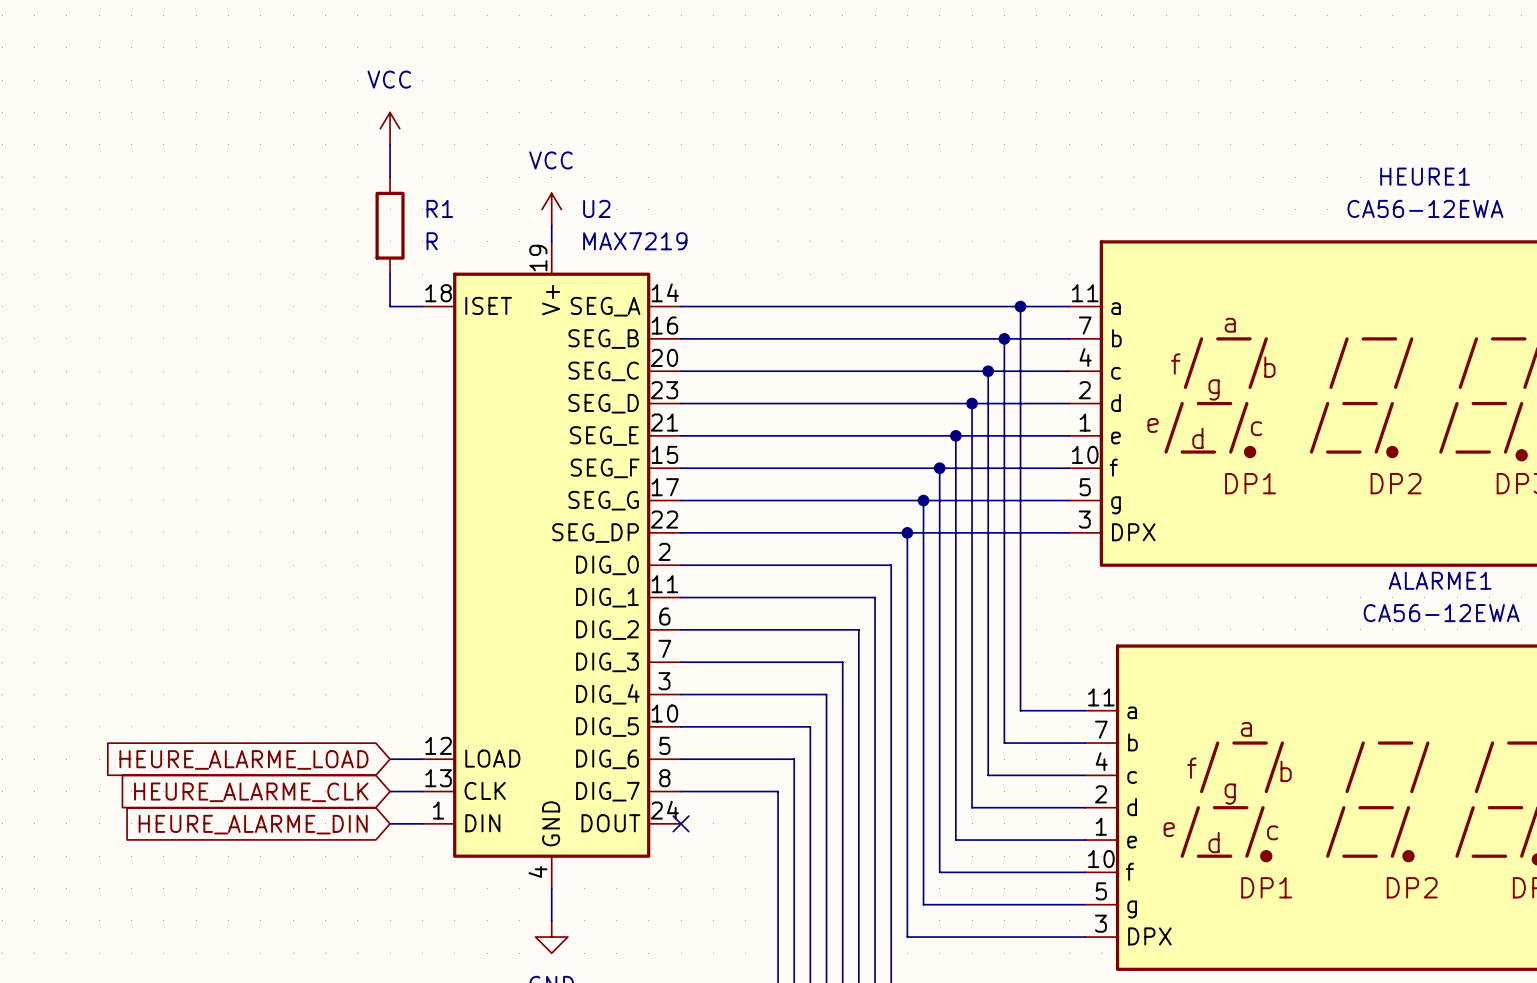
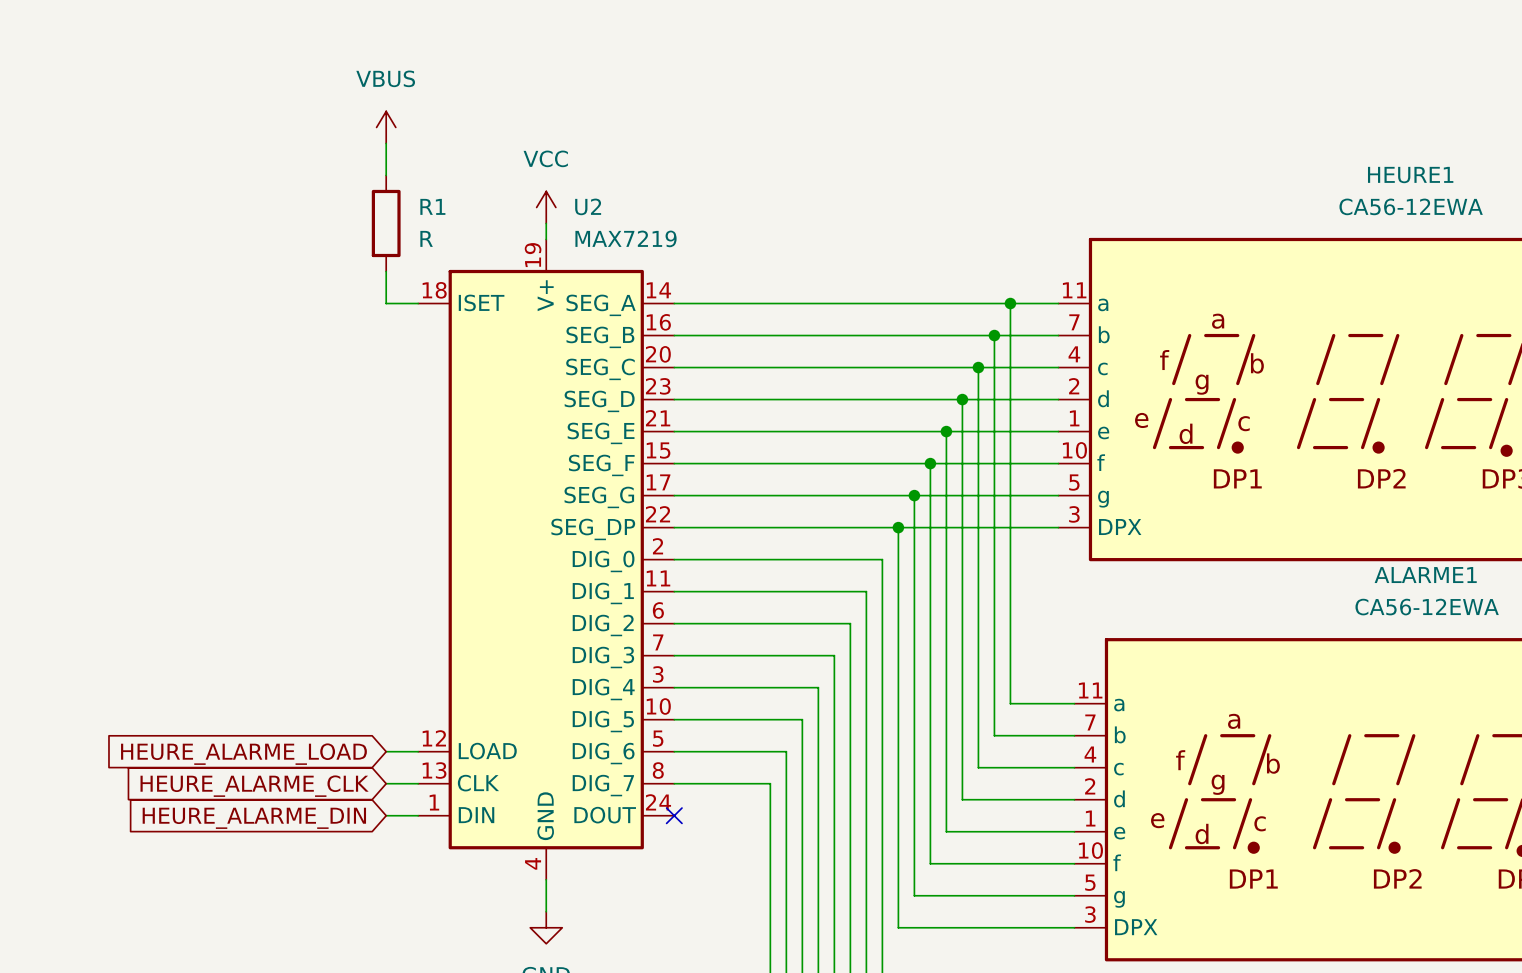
power symbol: VCC (390, 128) -> VBUS (386, 127)

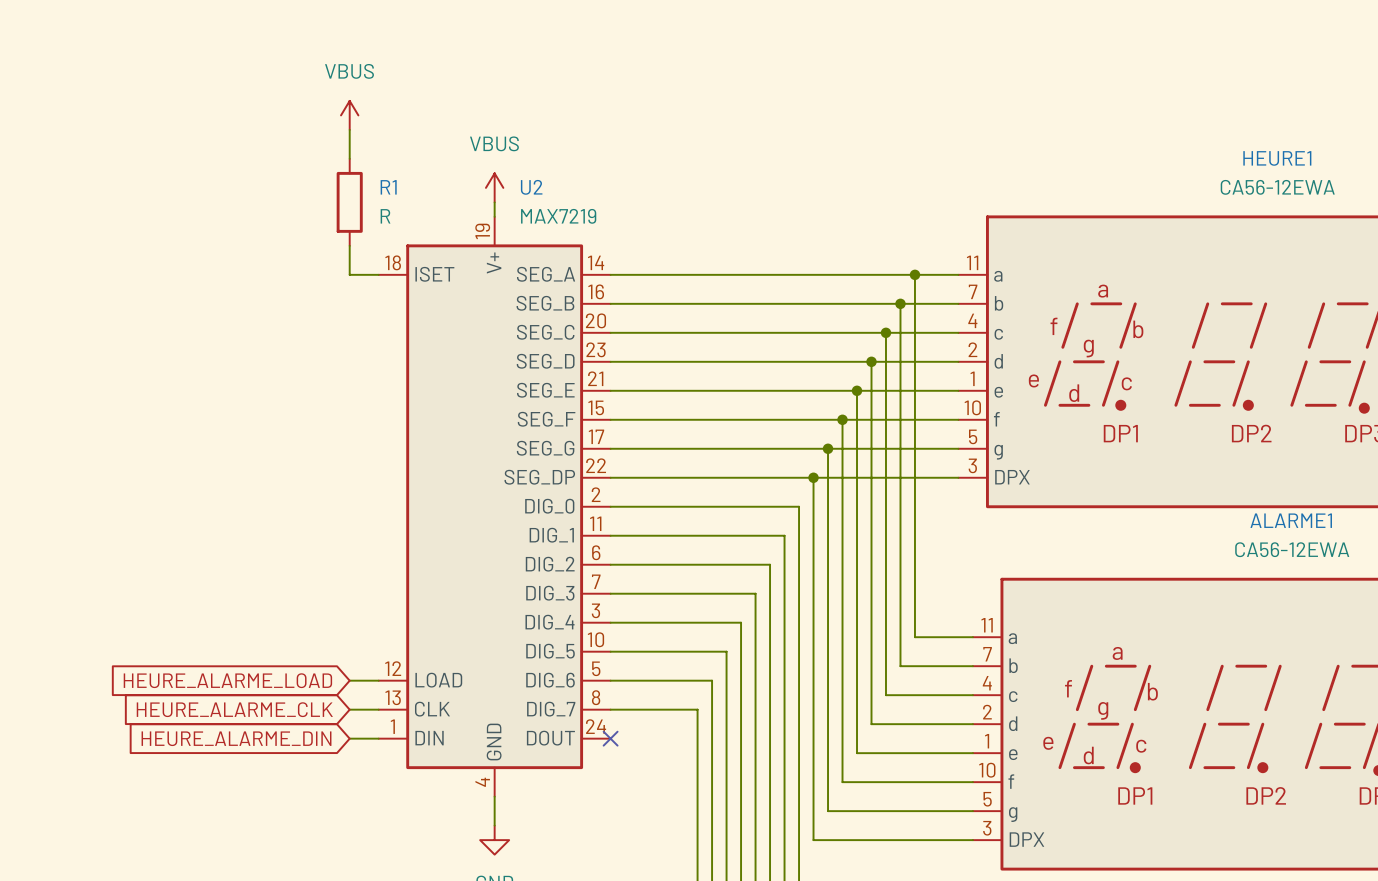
power symbol: VCC (546, 207) -> VBUS (494, 187)

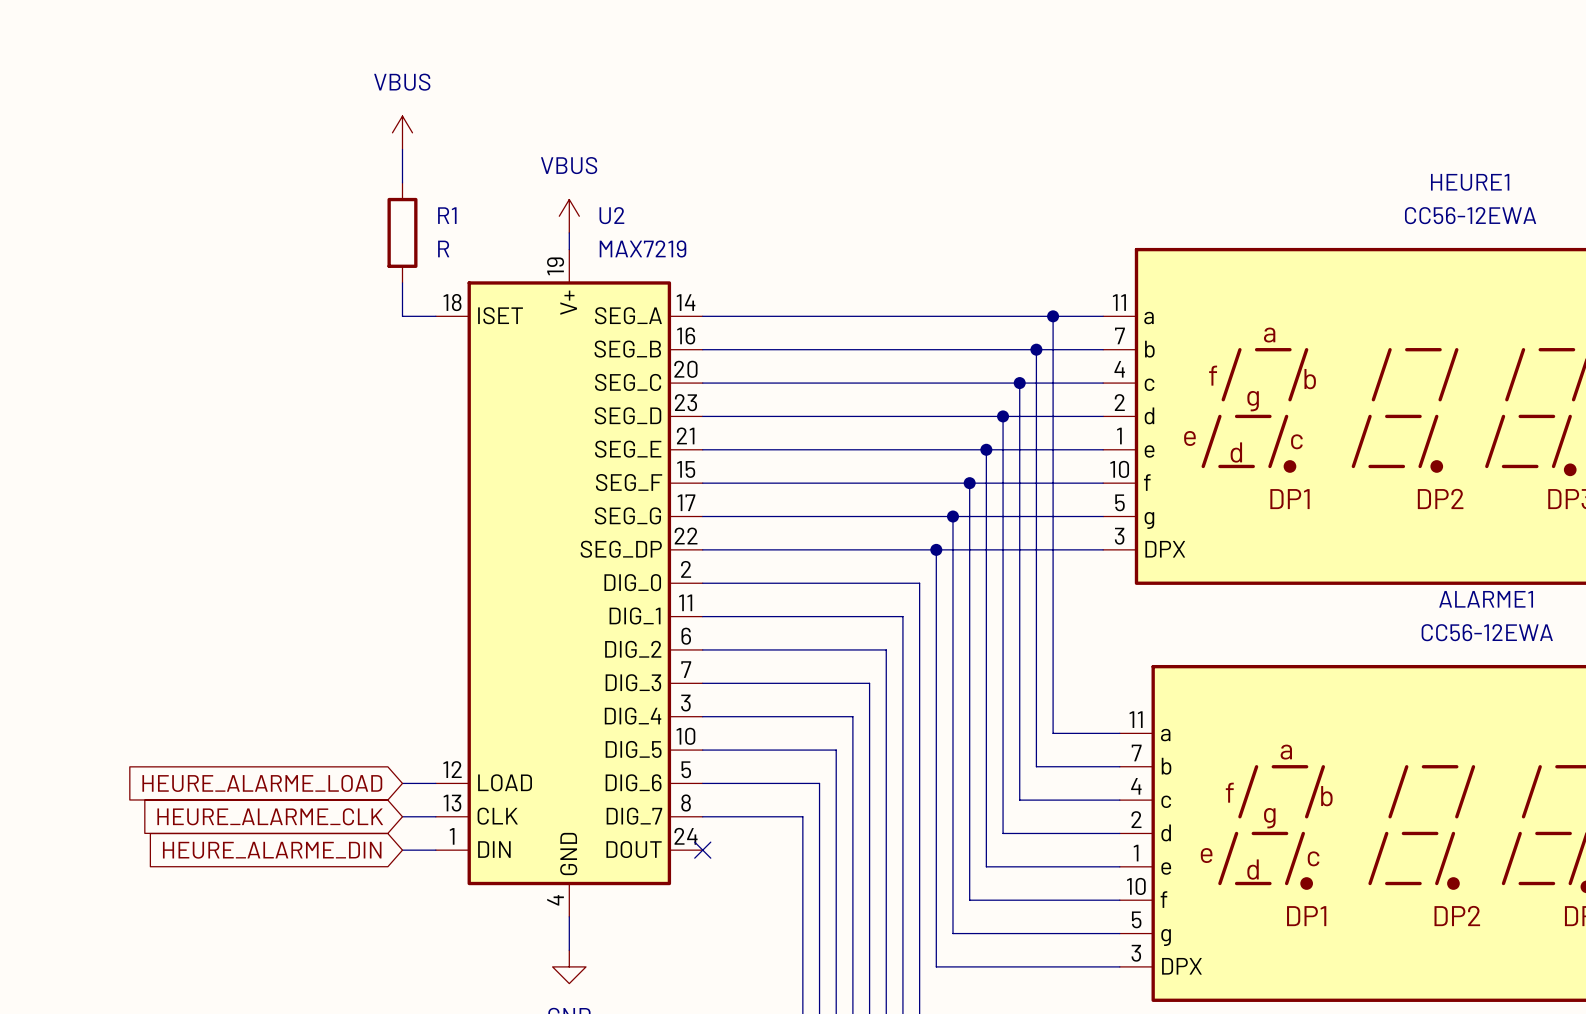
HEURE1 value: CA56-12EWA (1277, 187) -> CC56-12EWA (1470, 215)
ALARME1 value: CA56-12EWA (1292, 549) -> CC56-12EWA (1487, 632)

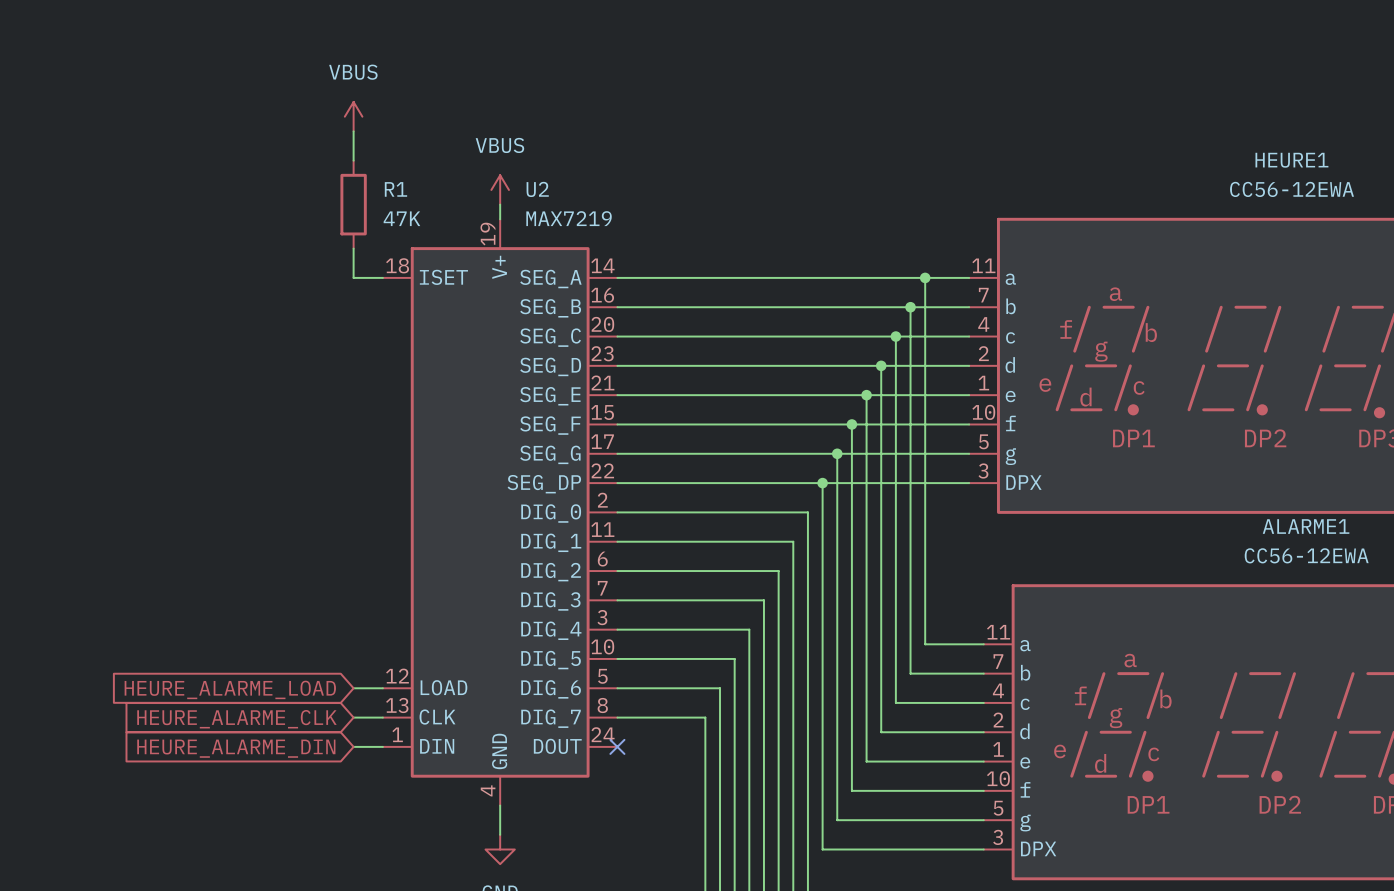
R1 value: R (443, 248) -> 47K (401, 218)

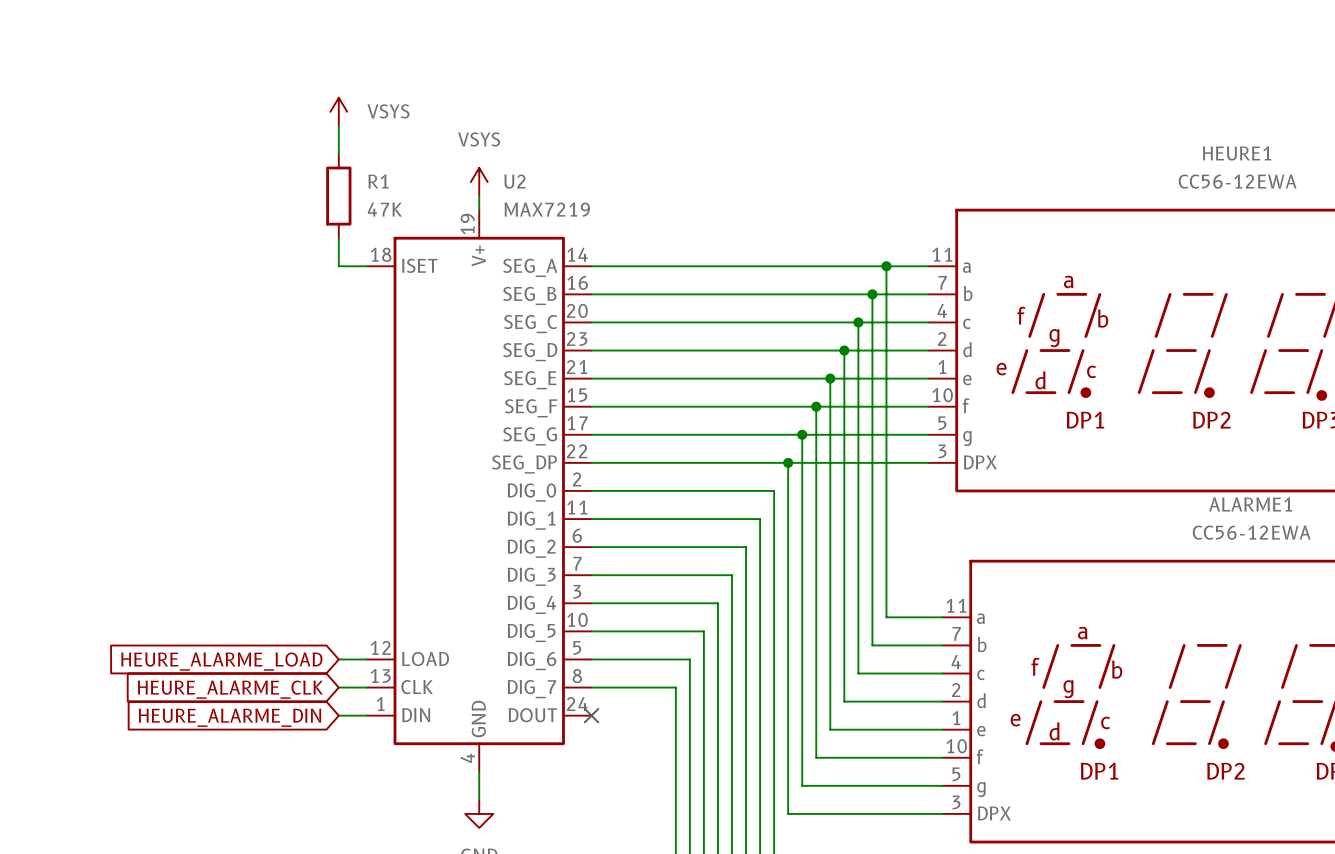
power symbol: VBUS (353, 116) -> VSYS (338, 111)
power symbol: VBUS (500, 189) -> VSYS (479, 182)

